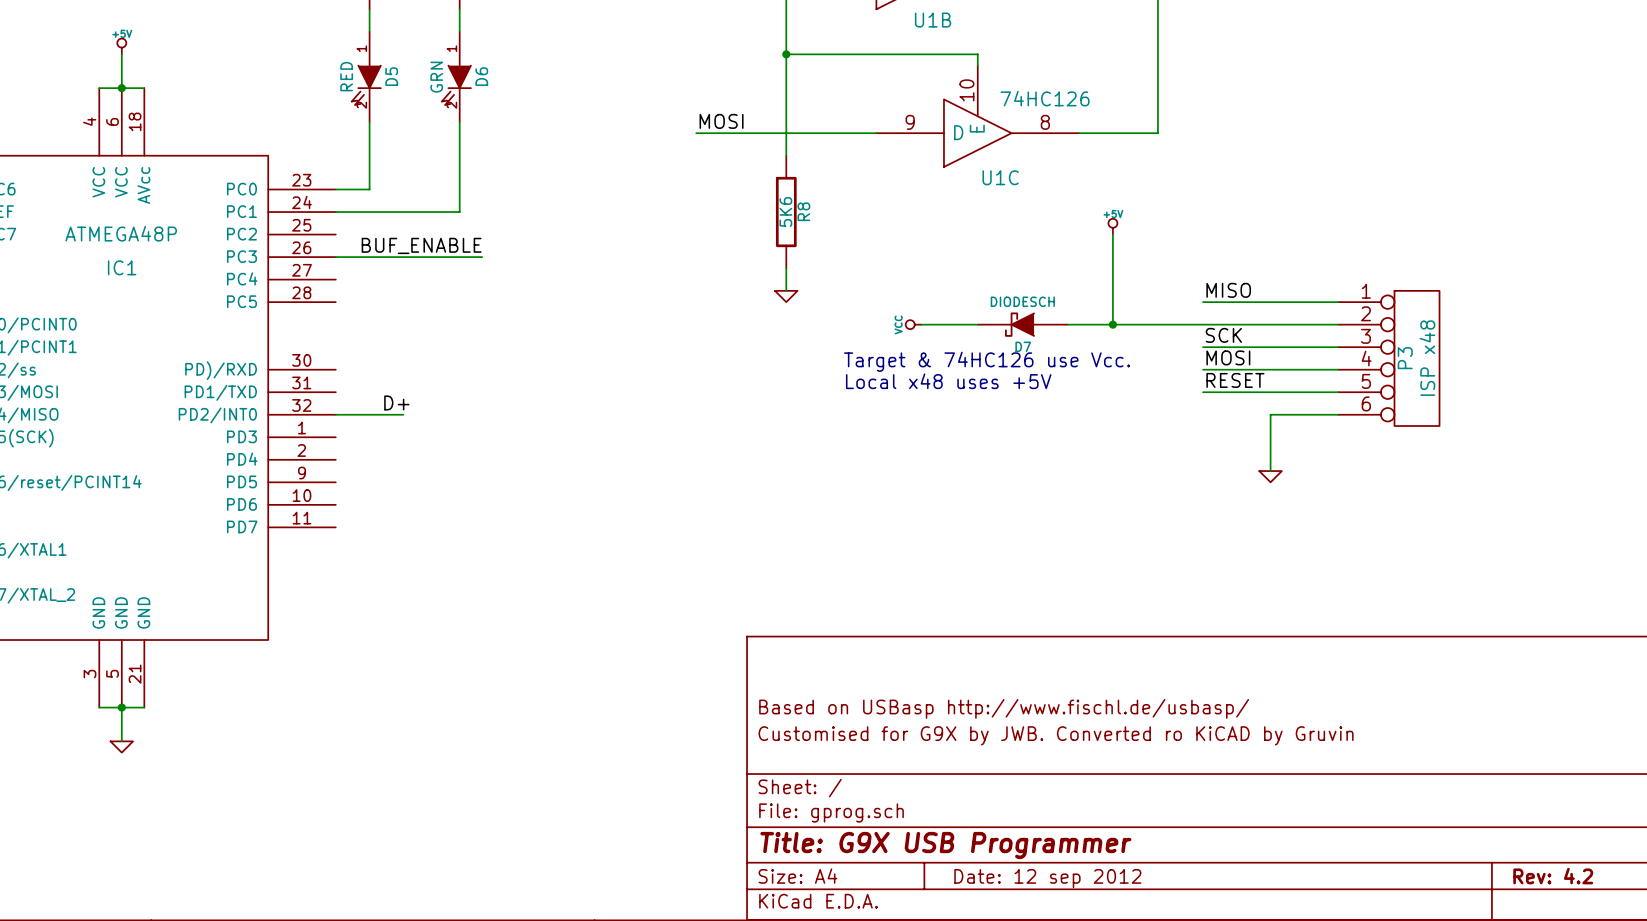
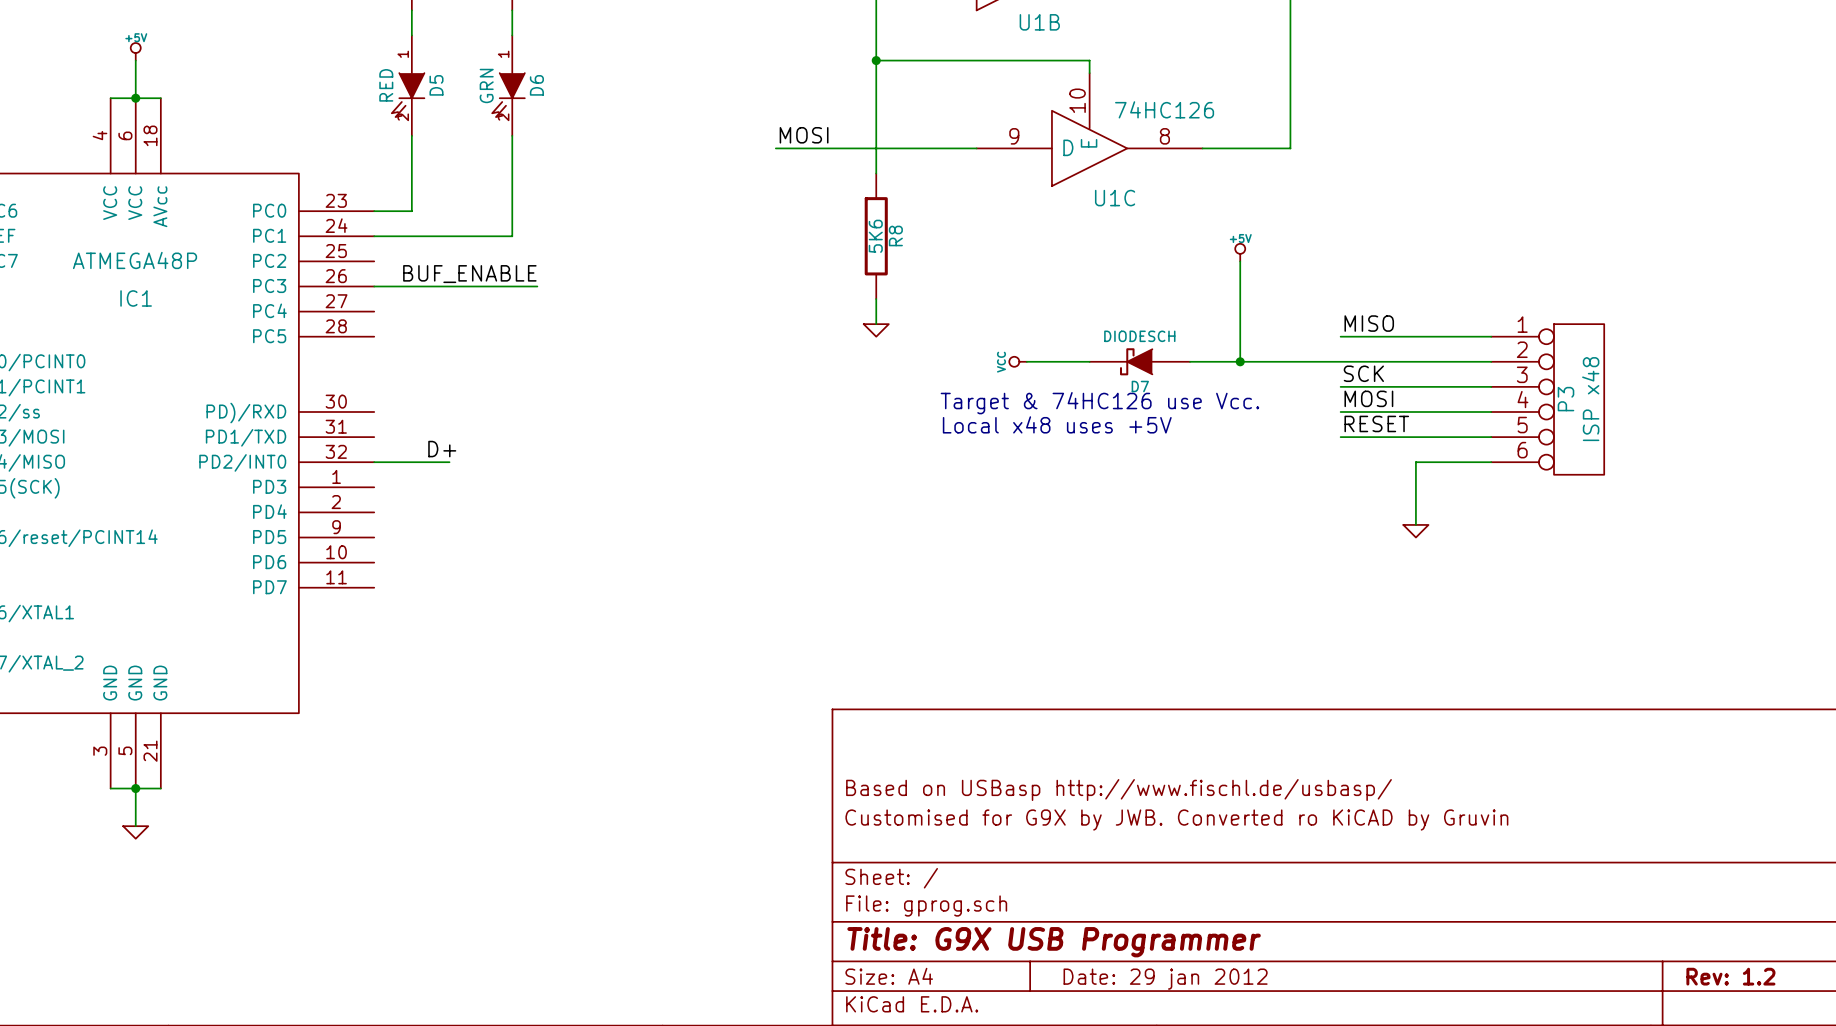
title block: Rev: 4.2 (1553, 876) -> Rev: 1.2 (1730, 976)
title block: Date: 12 sep 2012 (1047, 878) -> Date: 29 jan 2012 (1165, 979)

